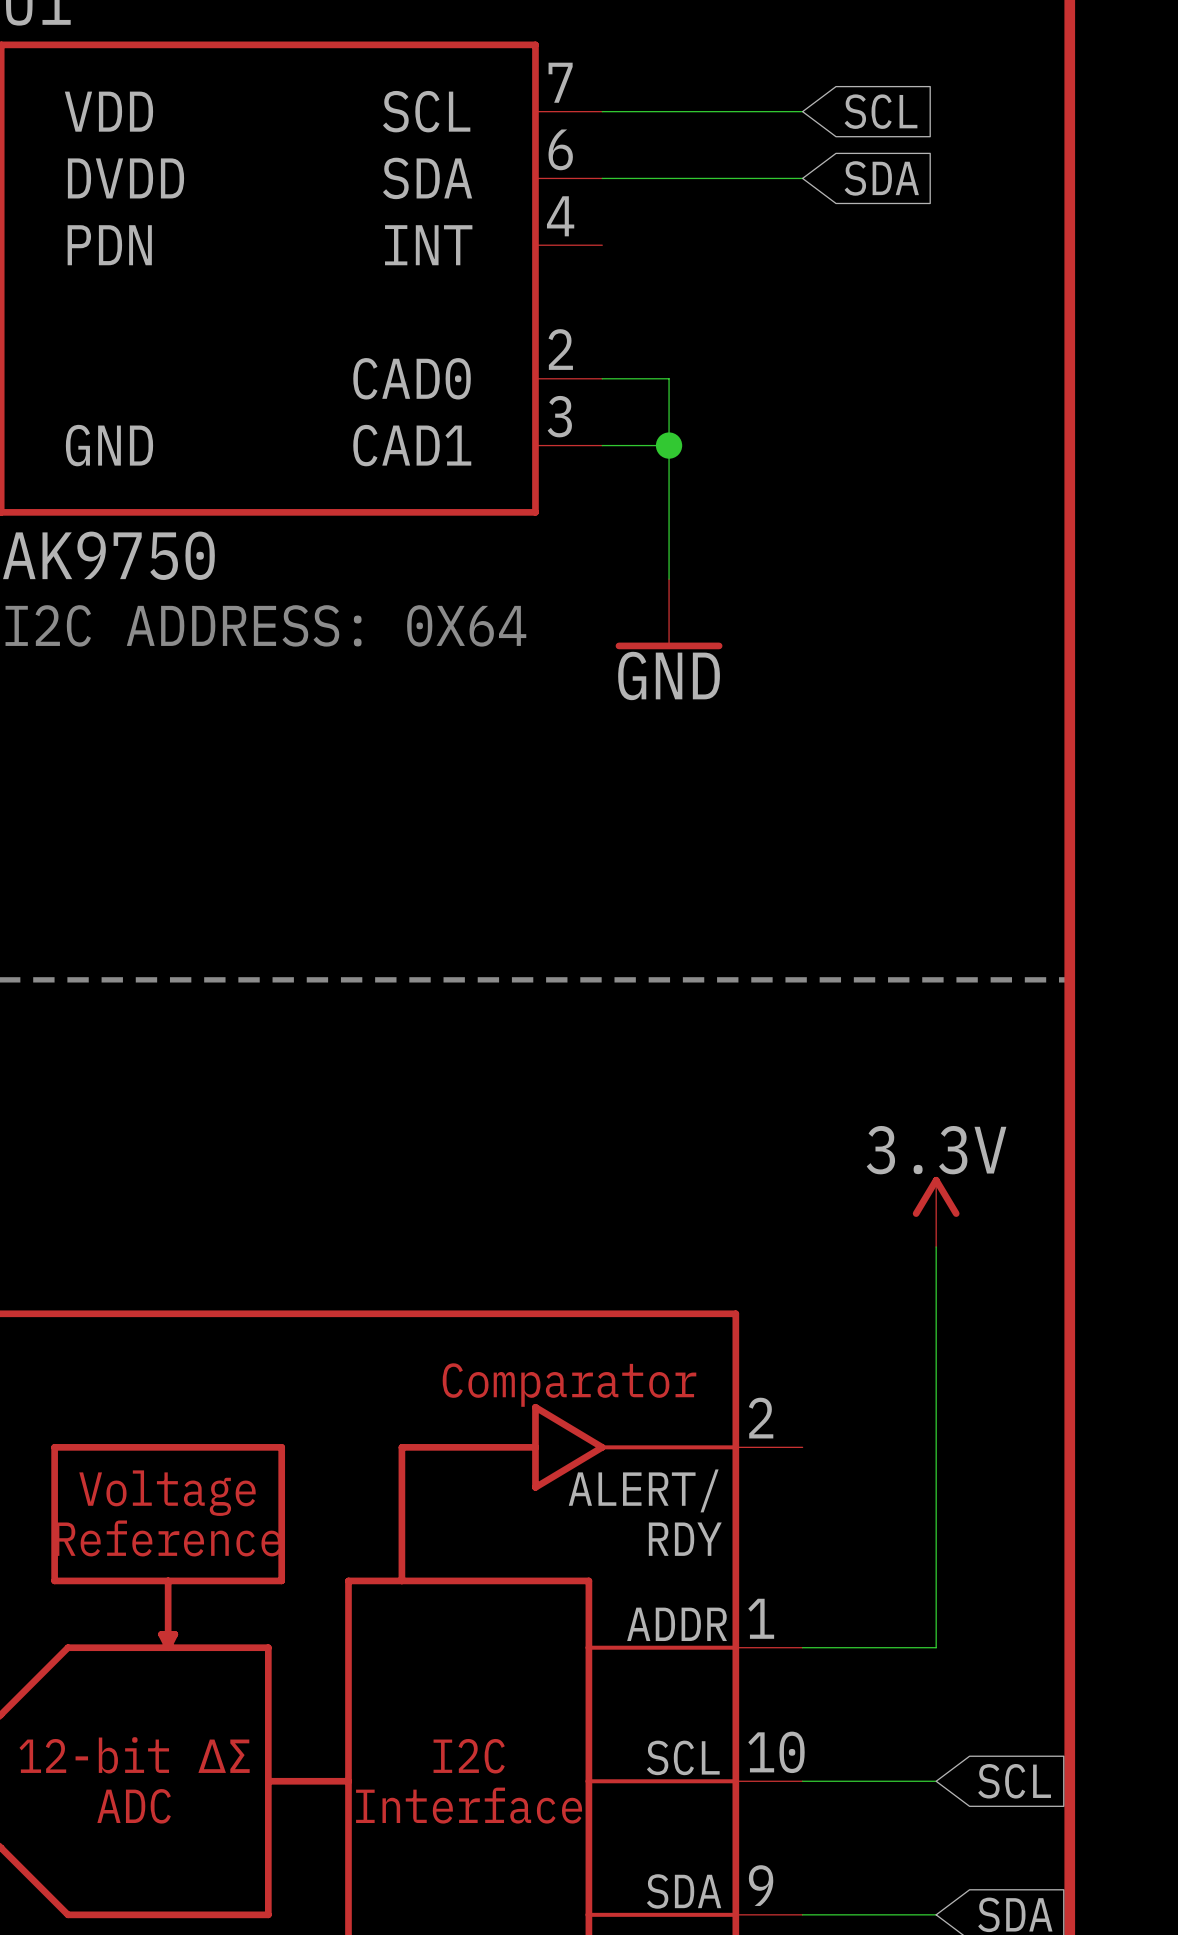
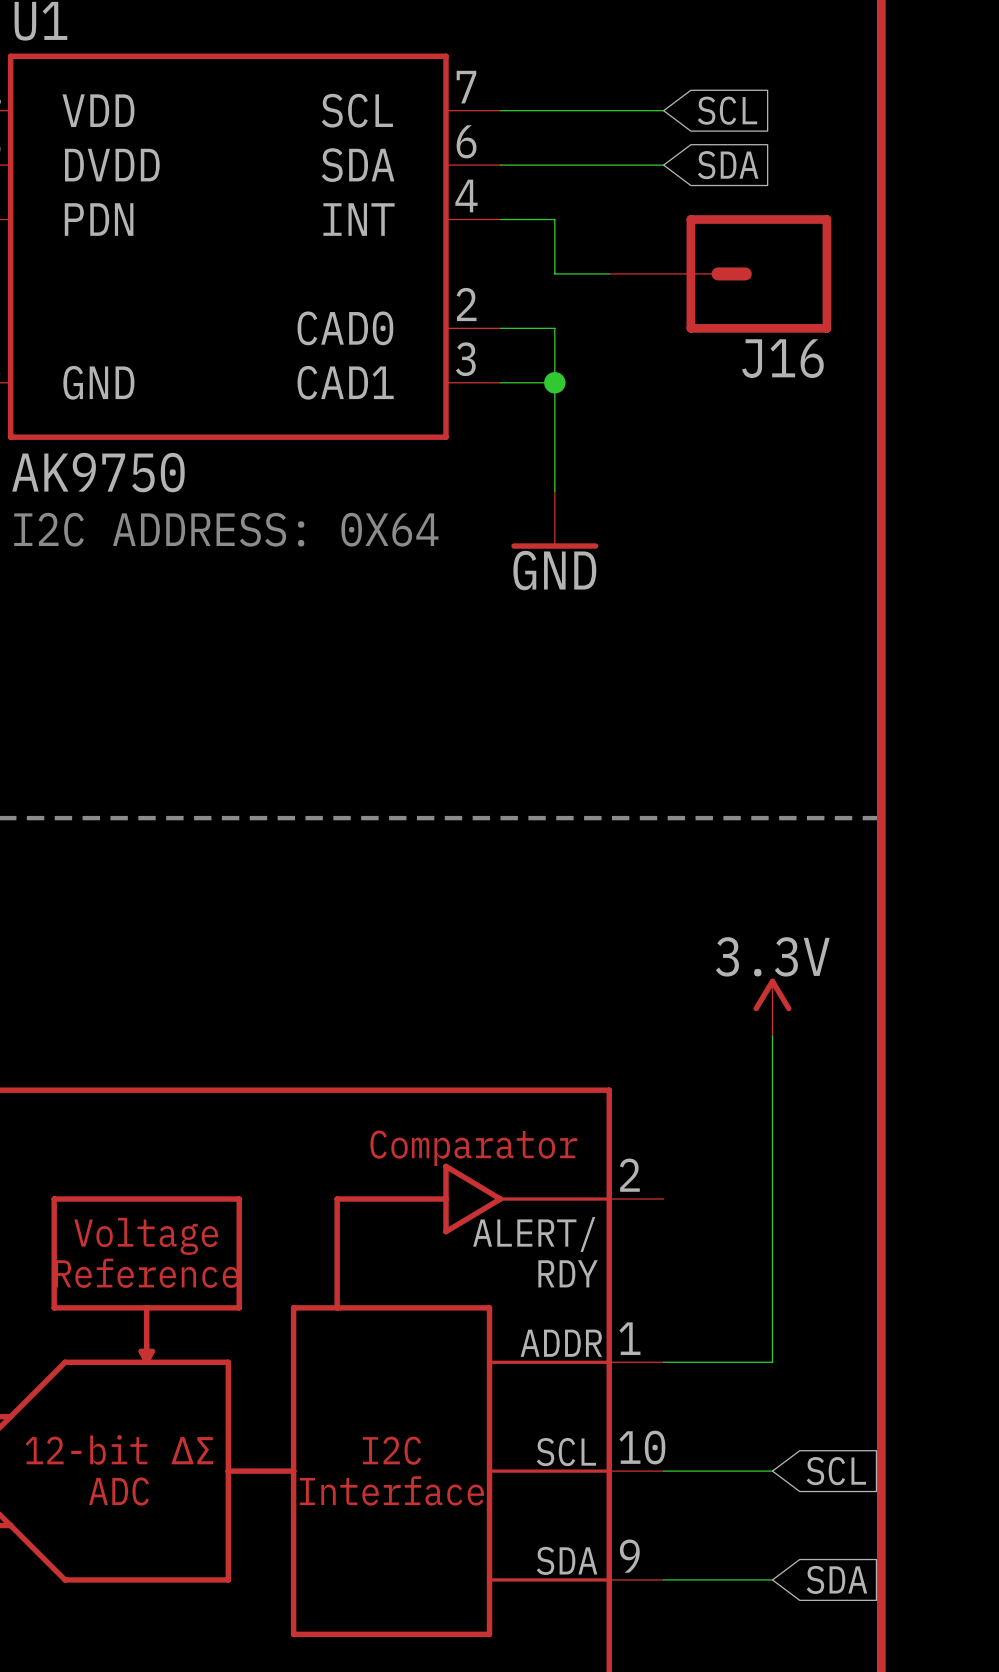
wire: none -> (500, 219) (554, 219) (554, 273) (609, 273)
J16: none -> (720, 273)

